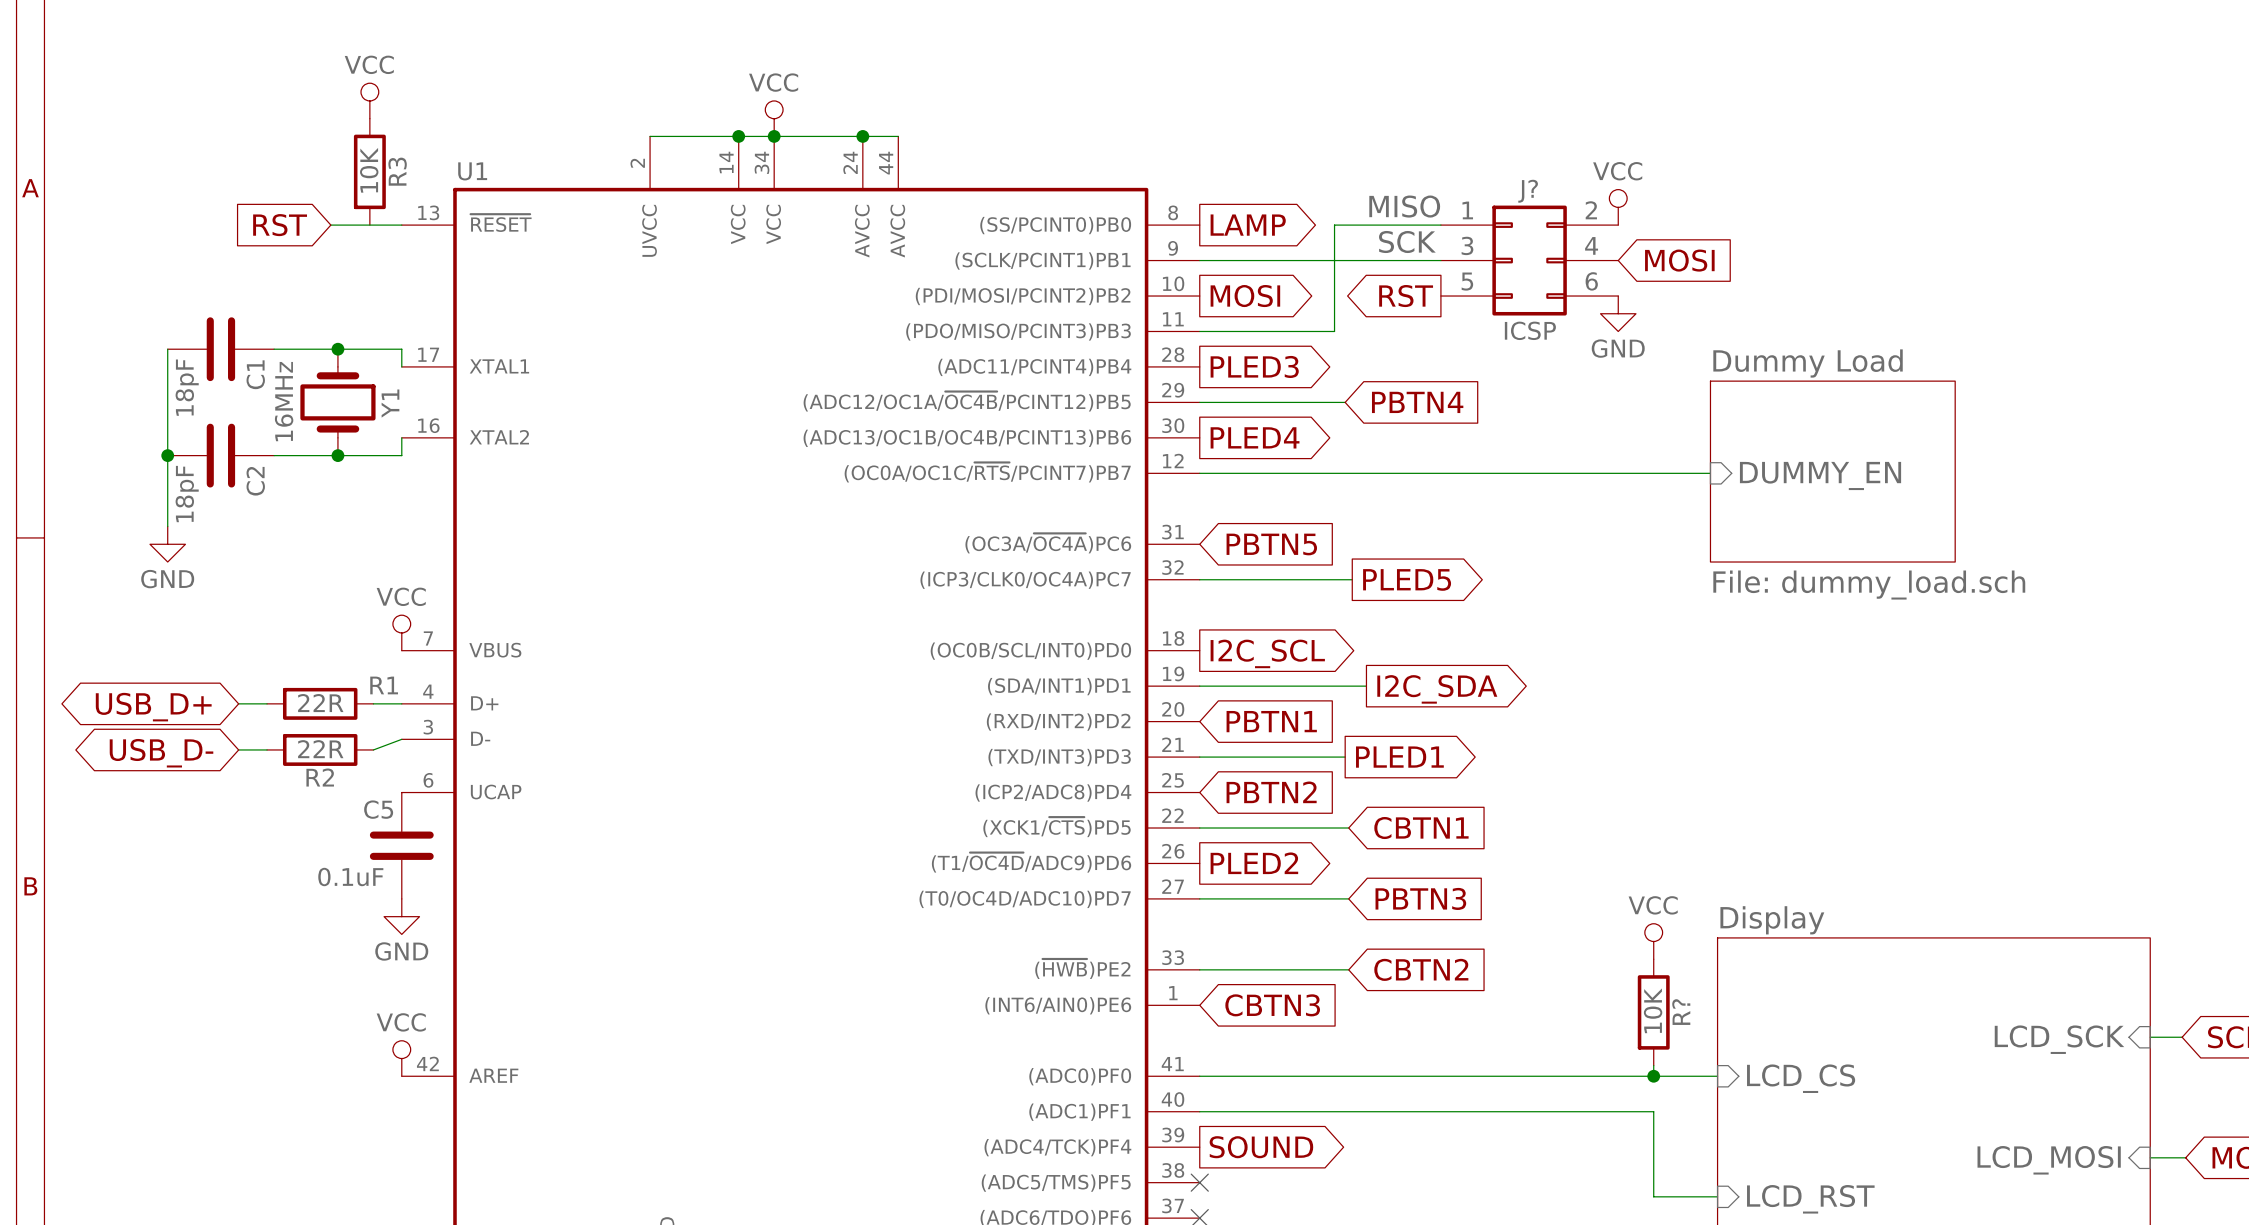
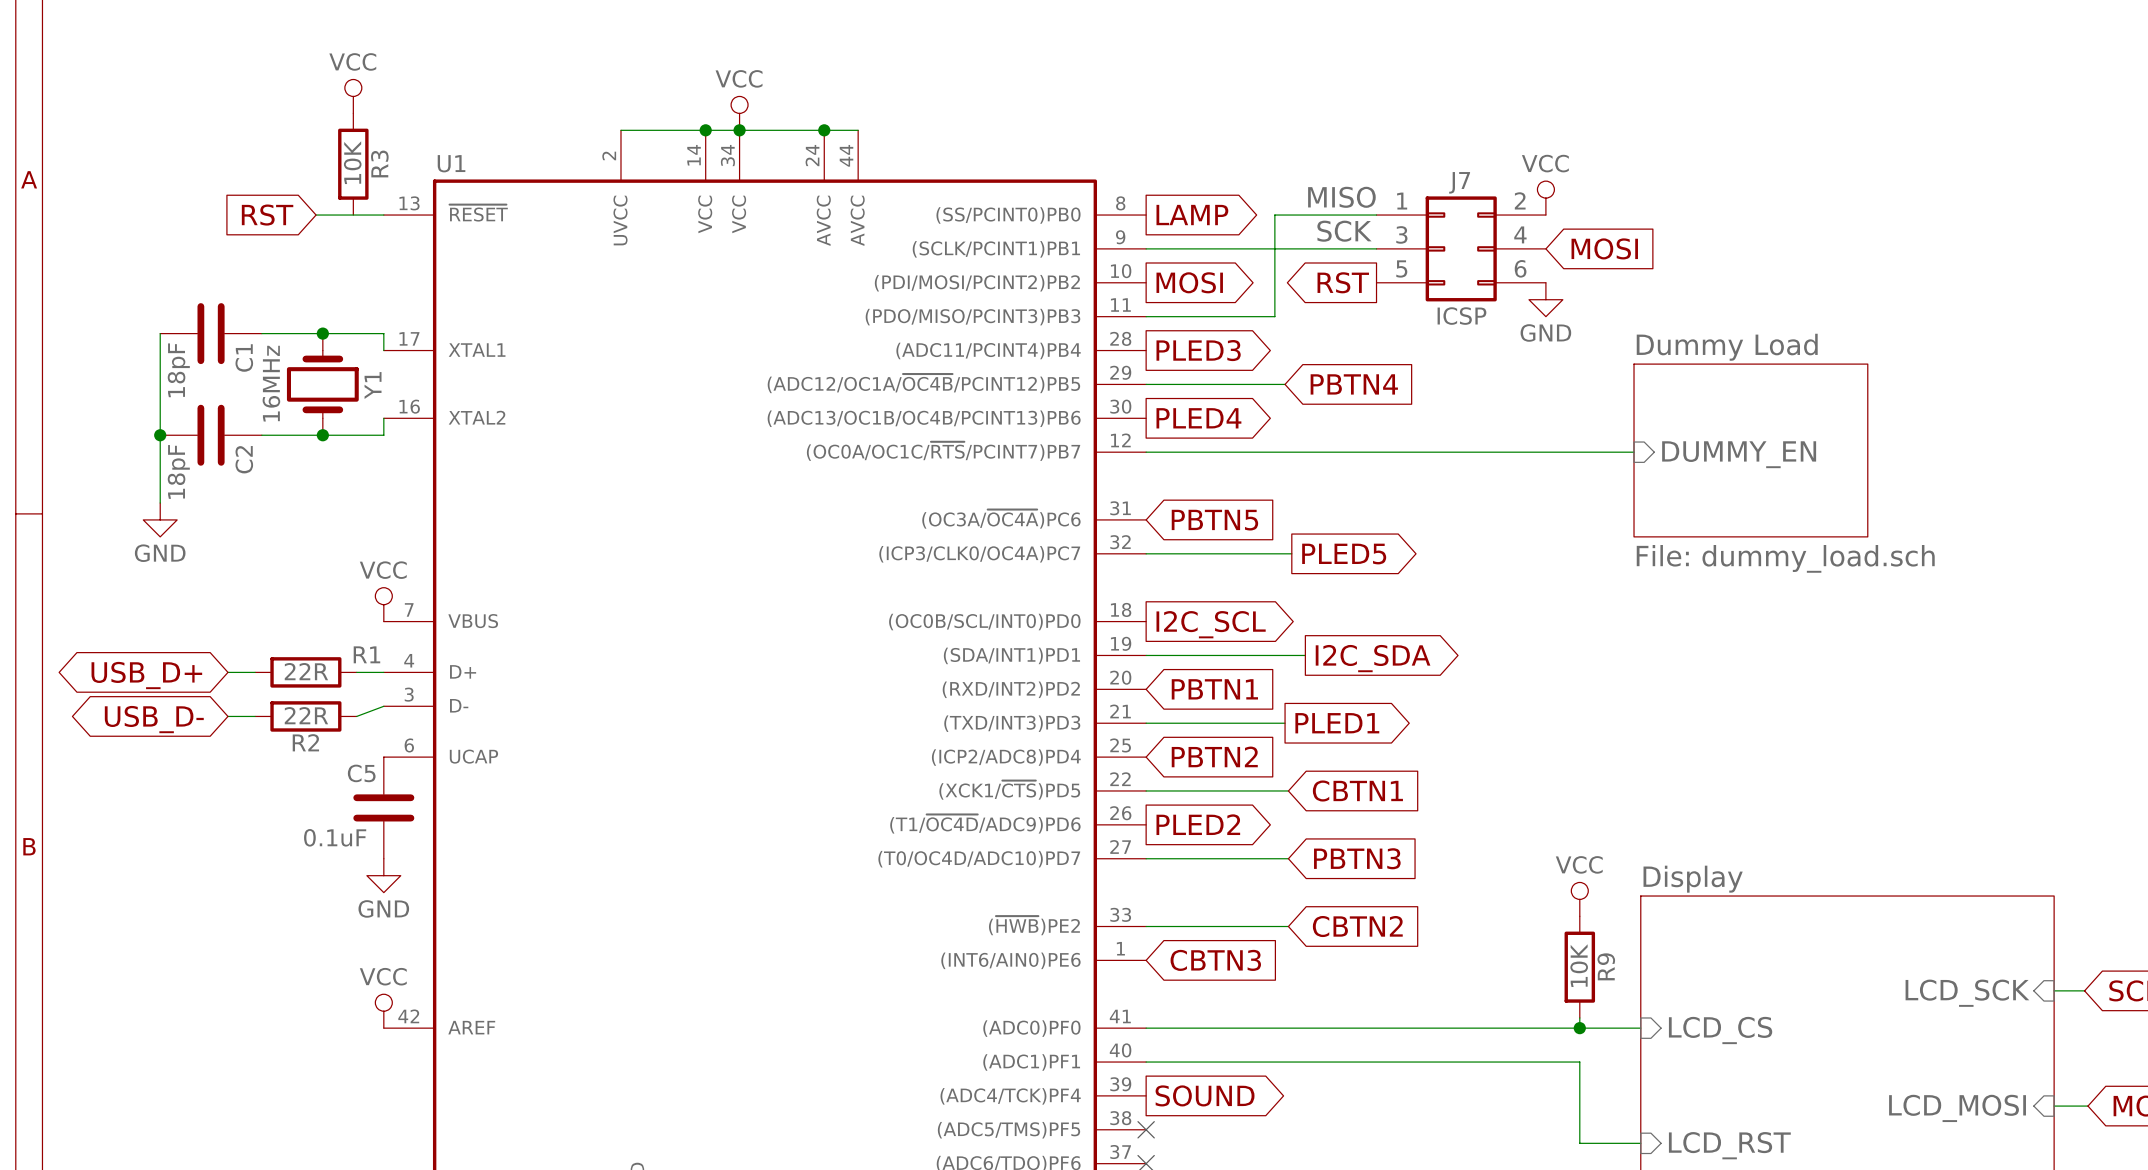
J? name: J? (1528, 191) -> J7 (1459, 182)
R? name: R? (1681, 1012) -> R9 (1606, 966)

